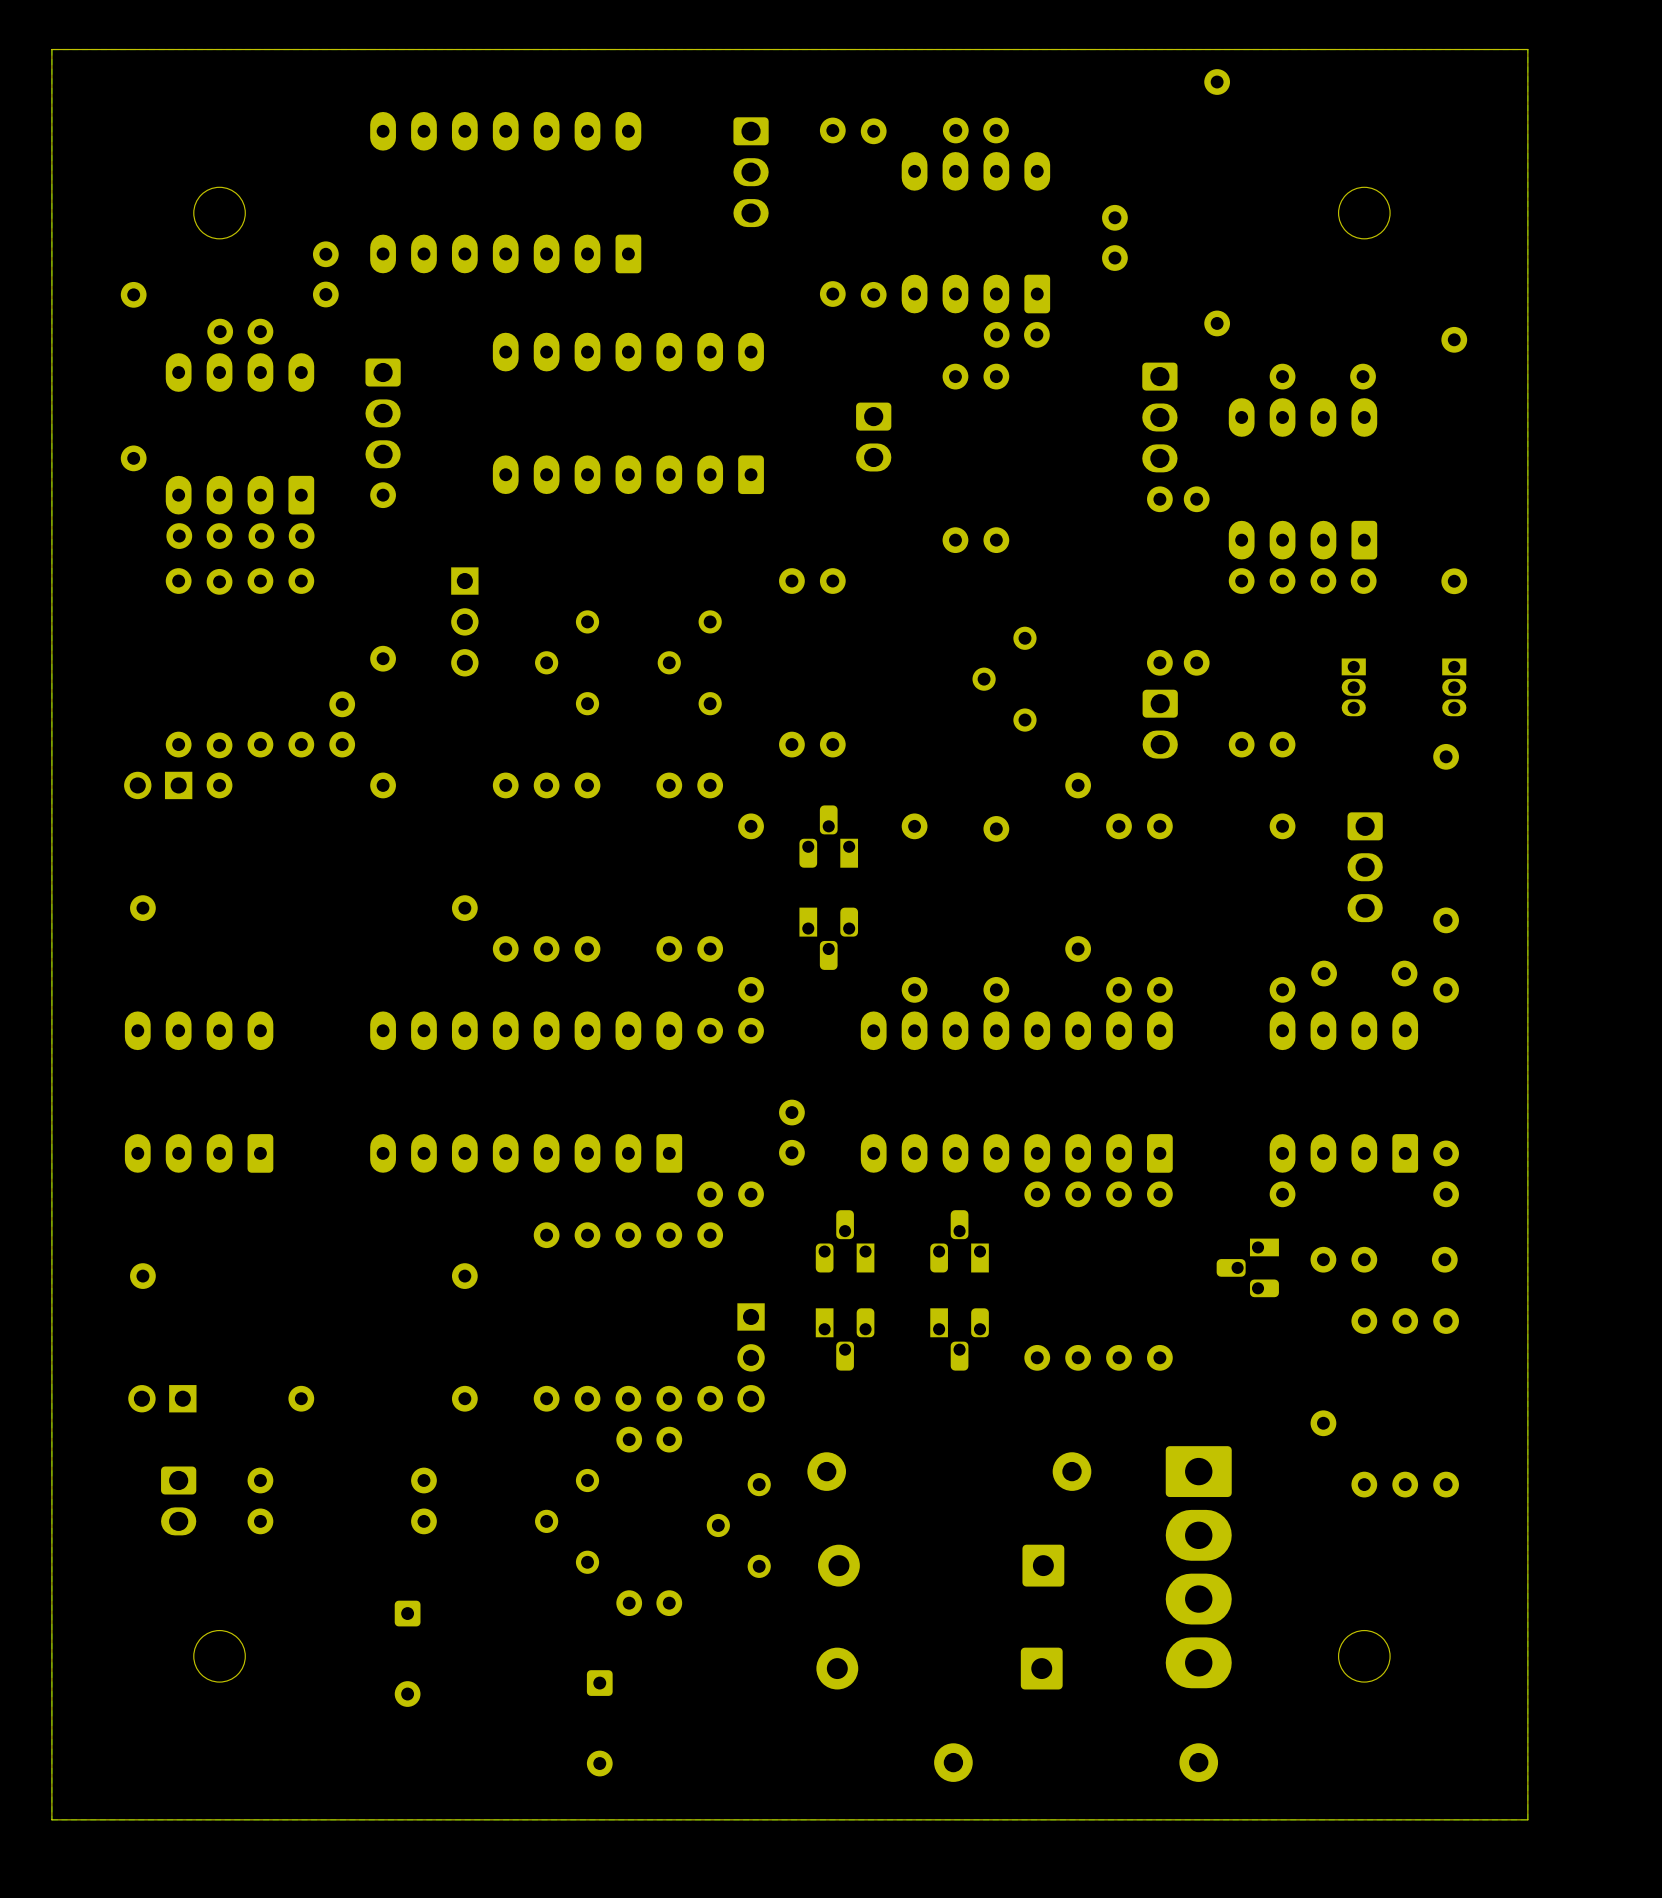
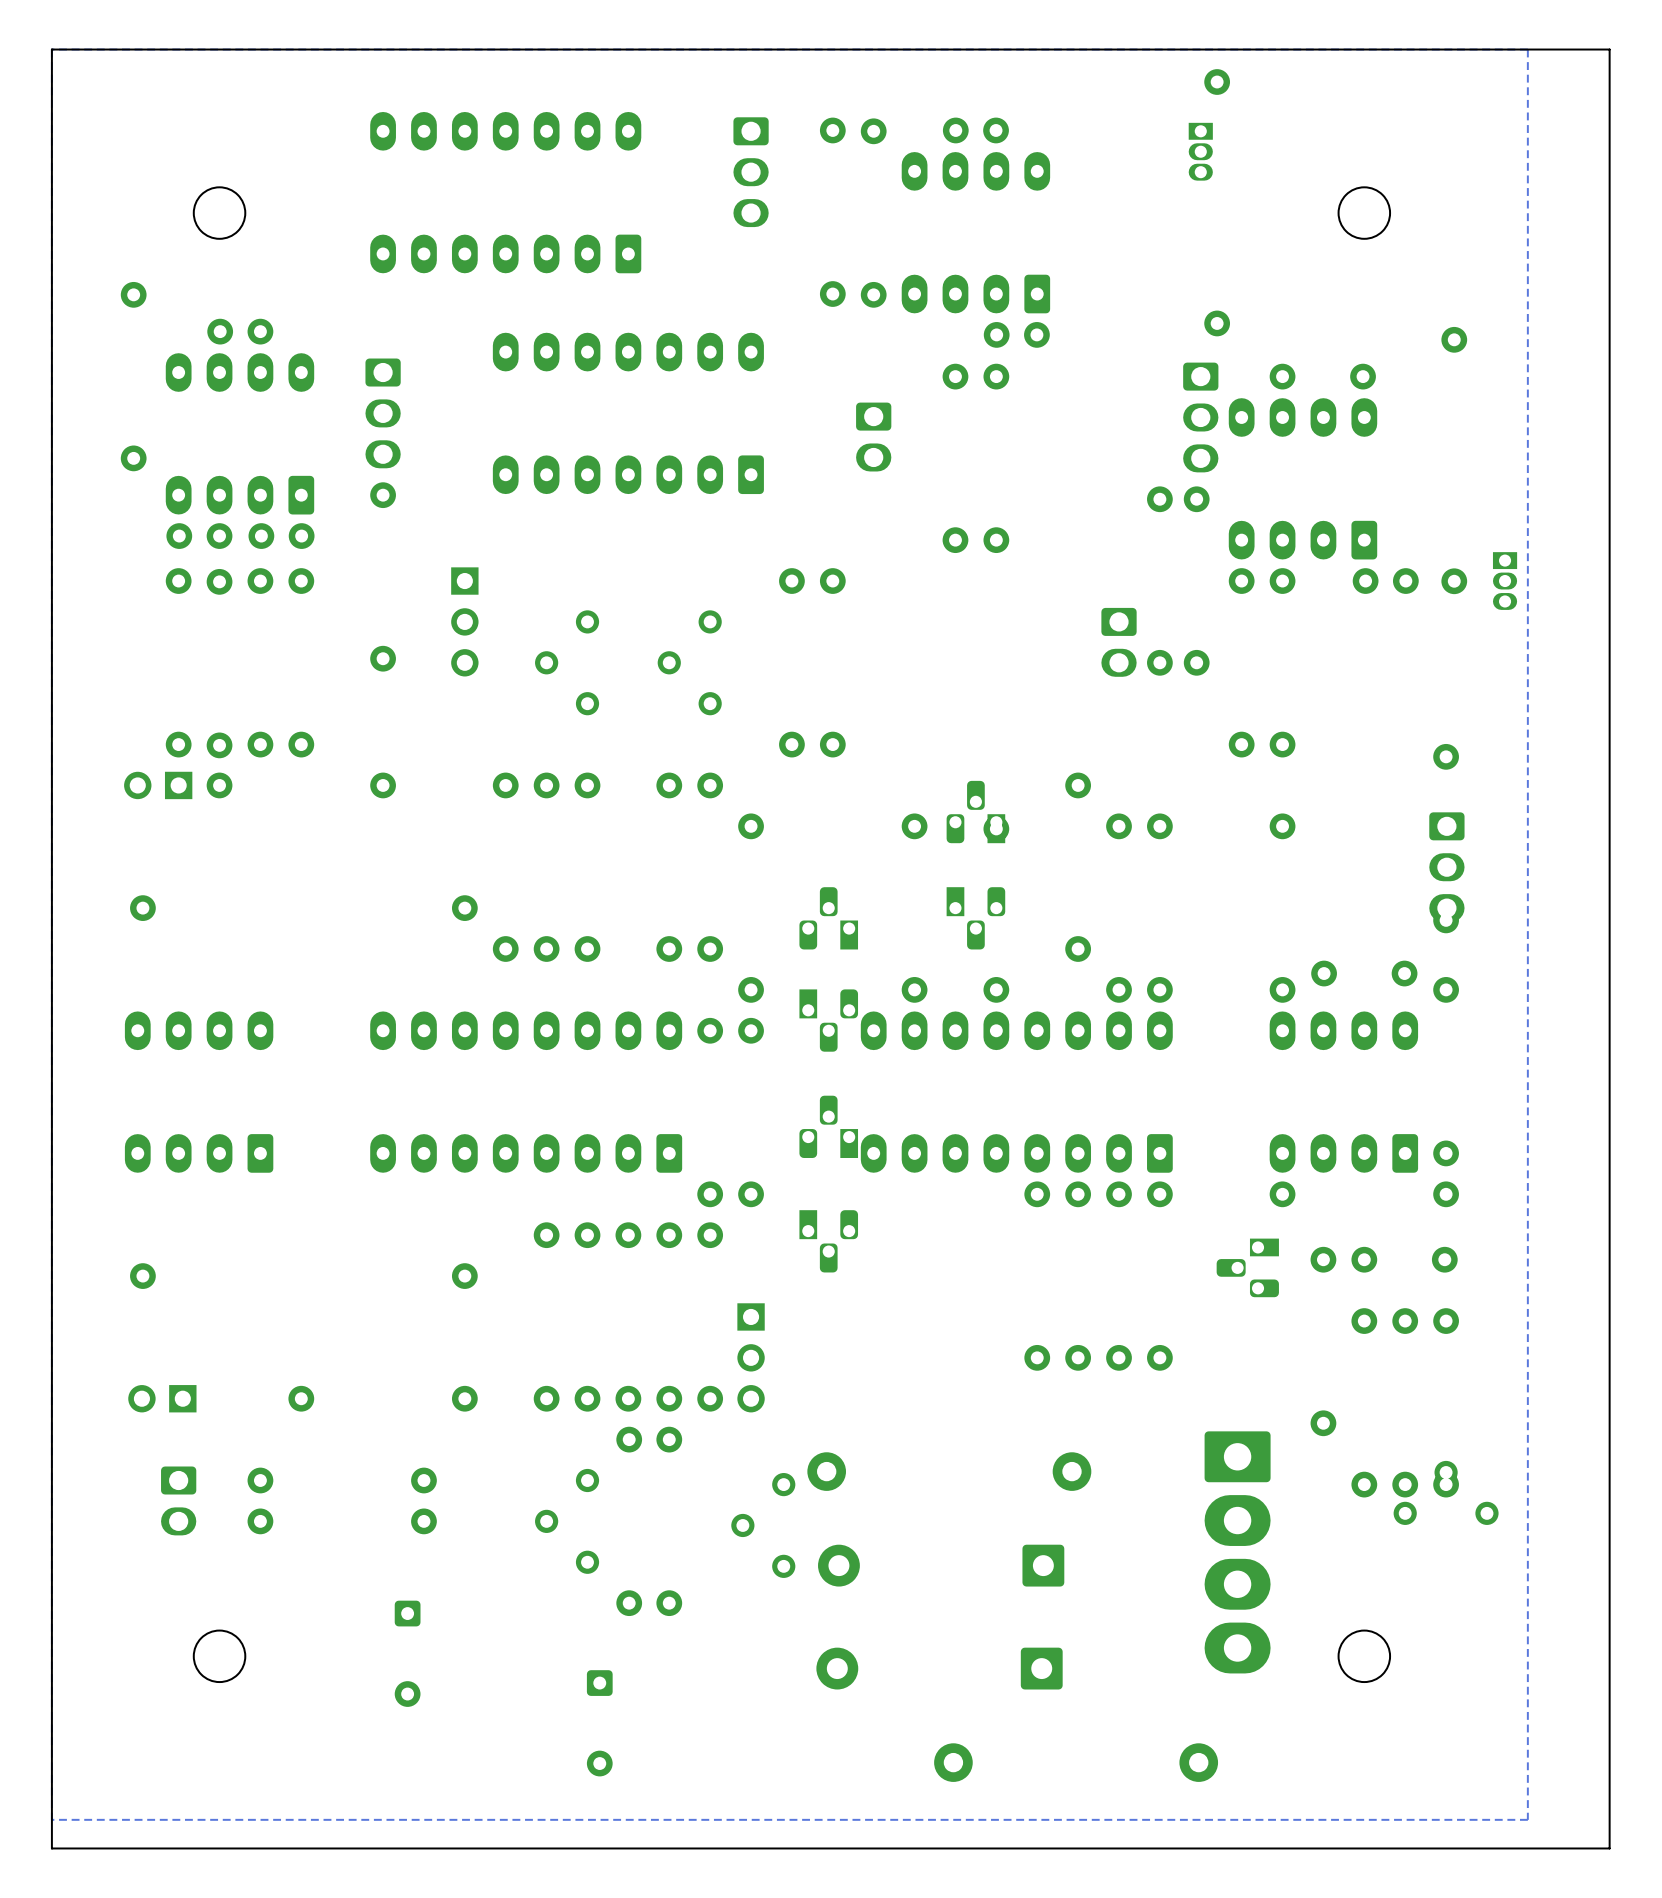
board edge: (1527, 49) (1527, 1819) (51, 1819) -> (1527, 49) (1609, 49) (1609, 1848) (51, 1848) (51, 1819)
part: none -> (1200, 151)
part: (1114, 237) -> none
part: (325, 274) -> none
part position: (1159, 417) -> (1200, 417)
part position: (1343, 581) -> (1385, 581)
part: none -> (1505, 581)
part: (1004, 679) -> none
part: (1353, 687) -> none
part: (1454, 687) -> none
part: (342, 724) -> none
part position: (1160, 724) -> (1119, 642)
part: none -> (975, 812)
part: (828, 836) -> none
part position: (1365, 867) -> (1446, 867)
part: none -> (975, 918)
part rotation: 0° (828, 938) -> 180° (828, 918)
part: none -> (828, 1020)
part: none -> (828, 1126)
part: (791, 1132) -> none
part rotation: 0° (845, 1241) -> 180° (828, 1241)
part: (959, 1241) -> none
part: (845, 1339) -> none
part: (959, 1339) -> none
part: none -> (1446, 1492)
part position: (738, 1525) -> (763, 1525)
part position: (1198, 1567) -> (1237, 1552)

